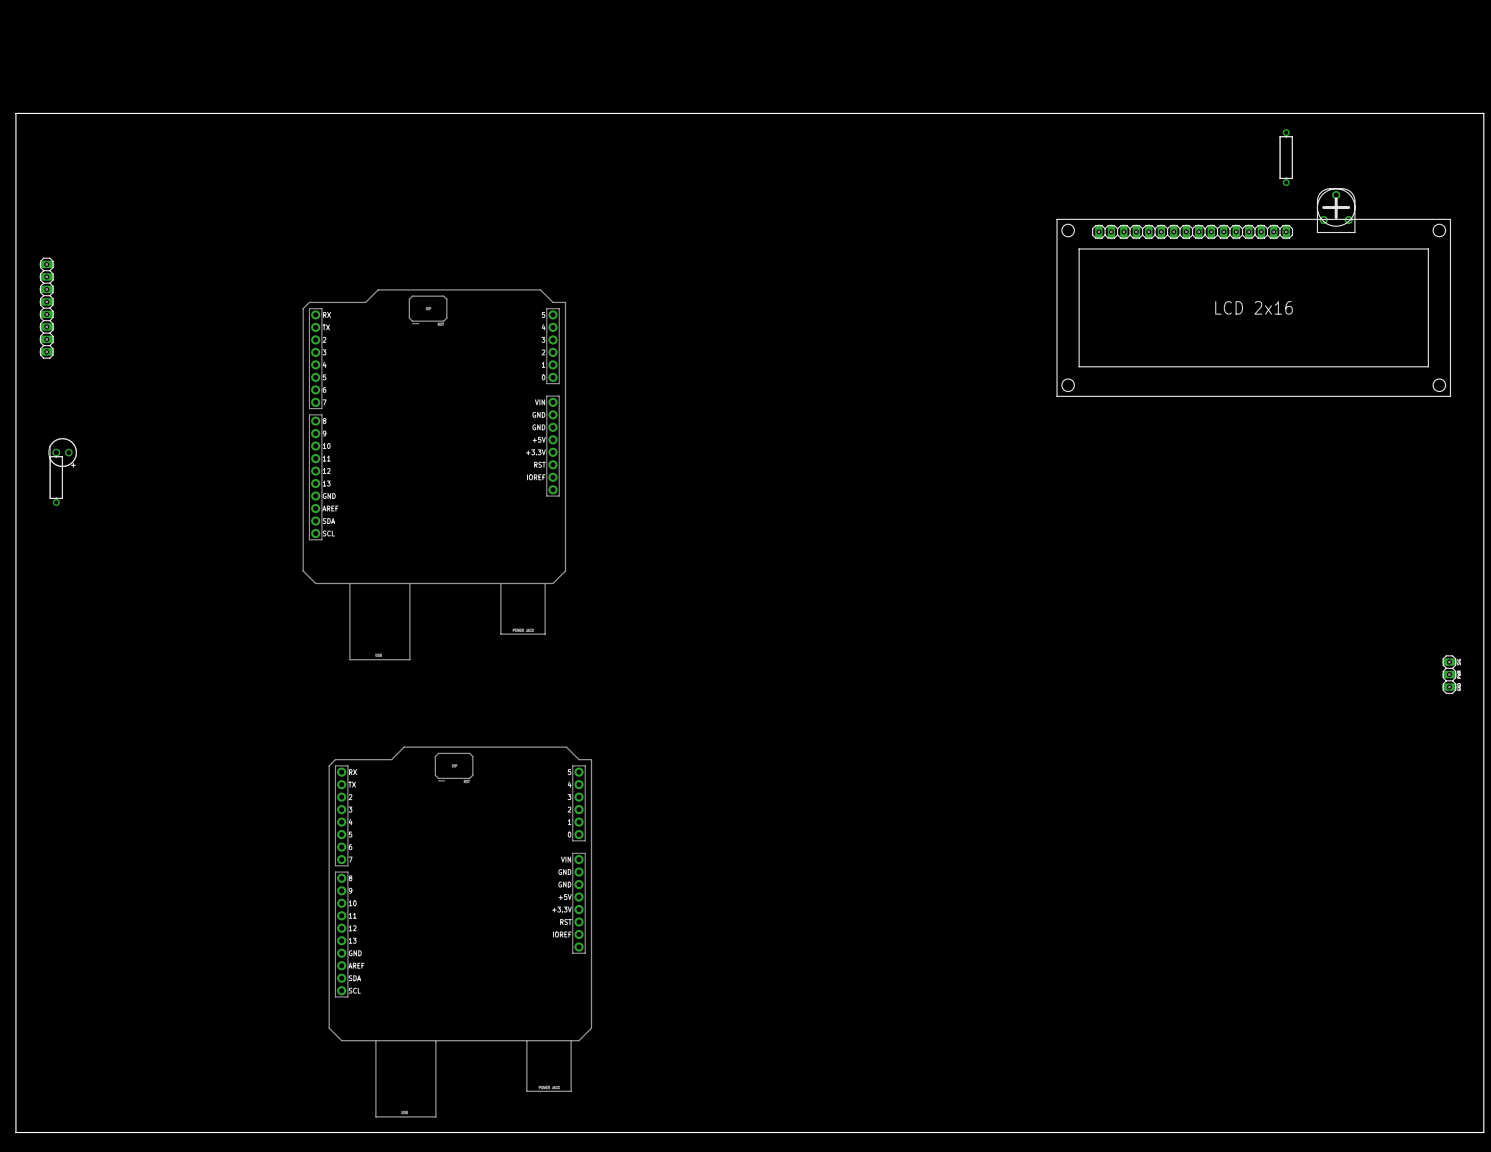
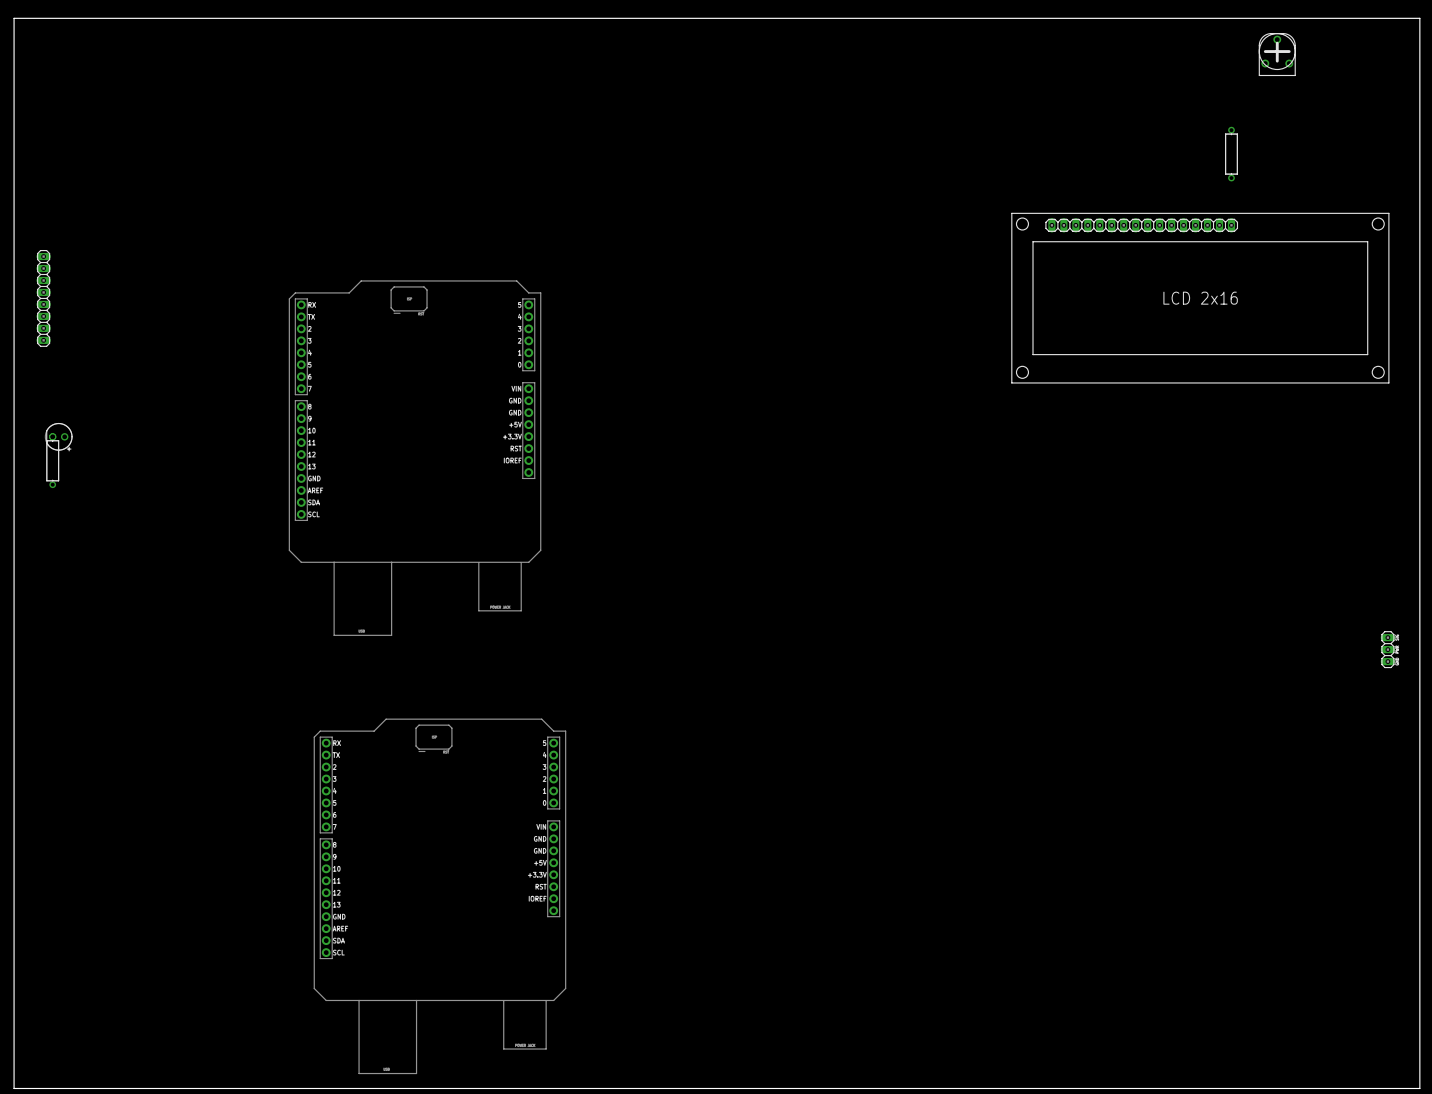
part: none -> (1277, 54)
board edge: (15, 113) (1483, 113) (1482, 1132) -> (14, 111) (14, 18) (1419, 18) (1419, 1088)
part: (1336, 210) -> none

